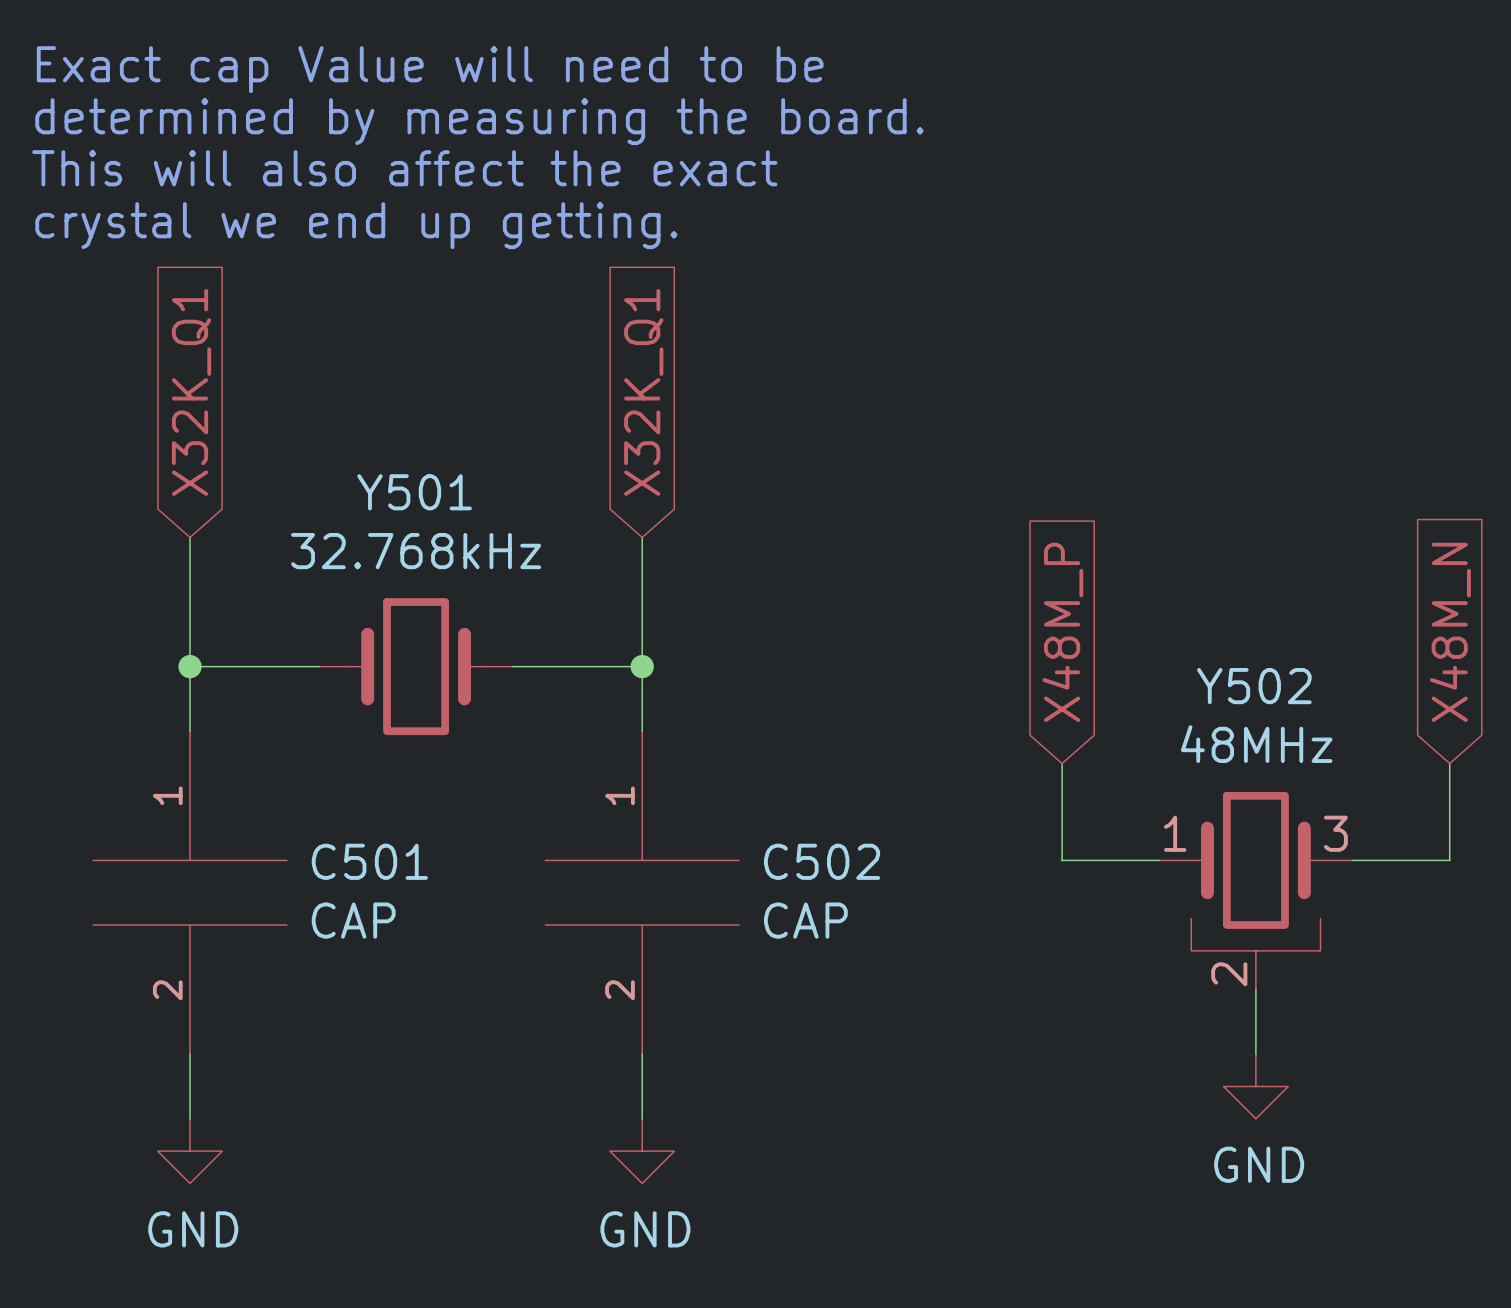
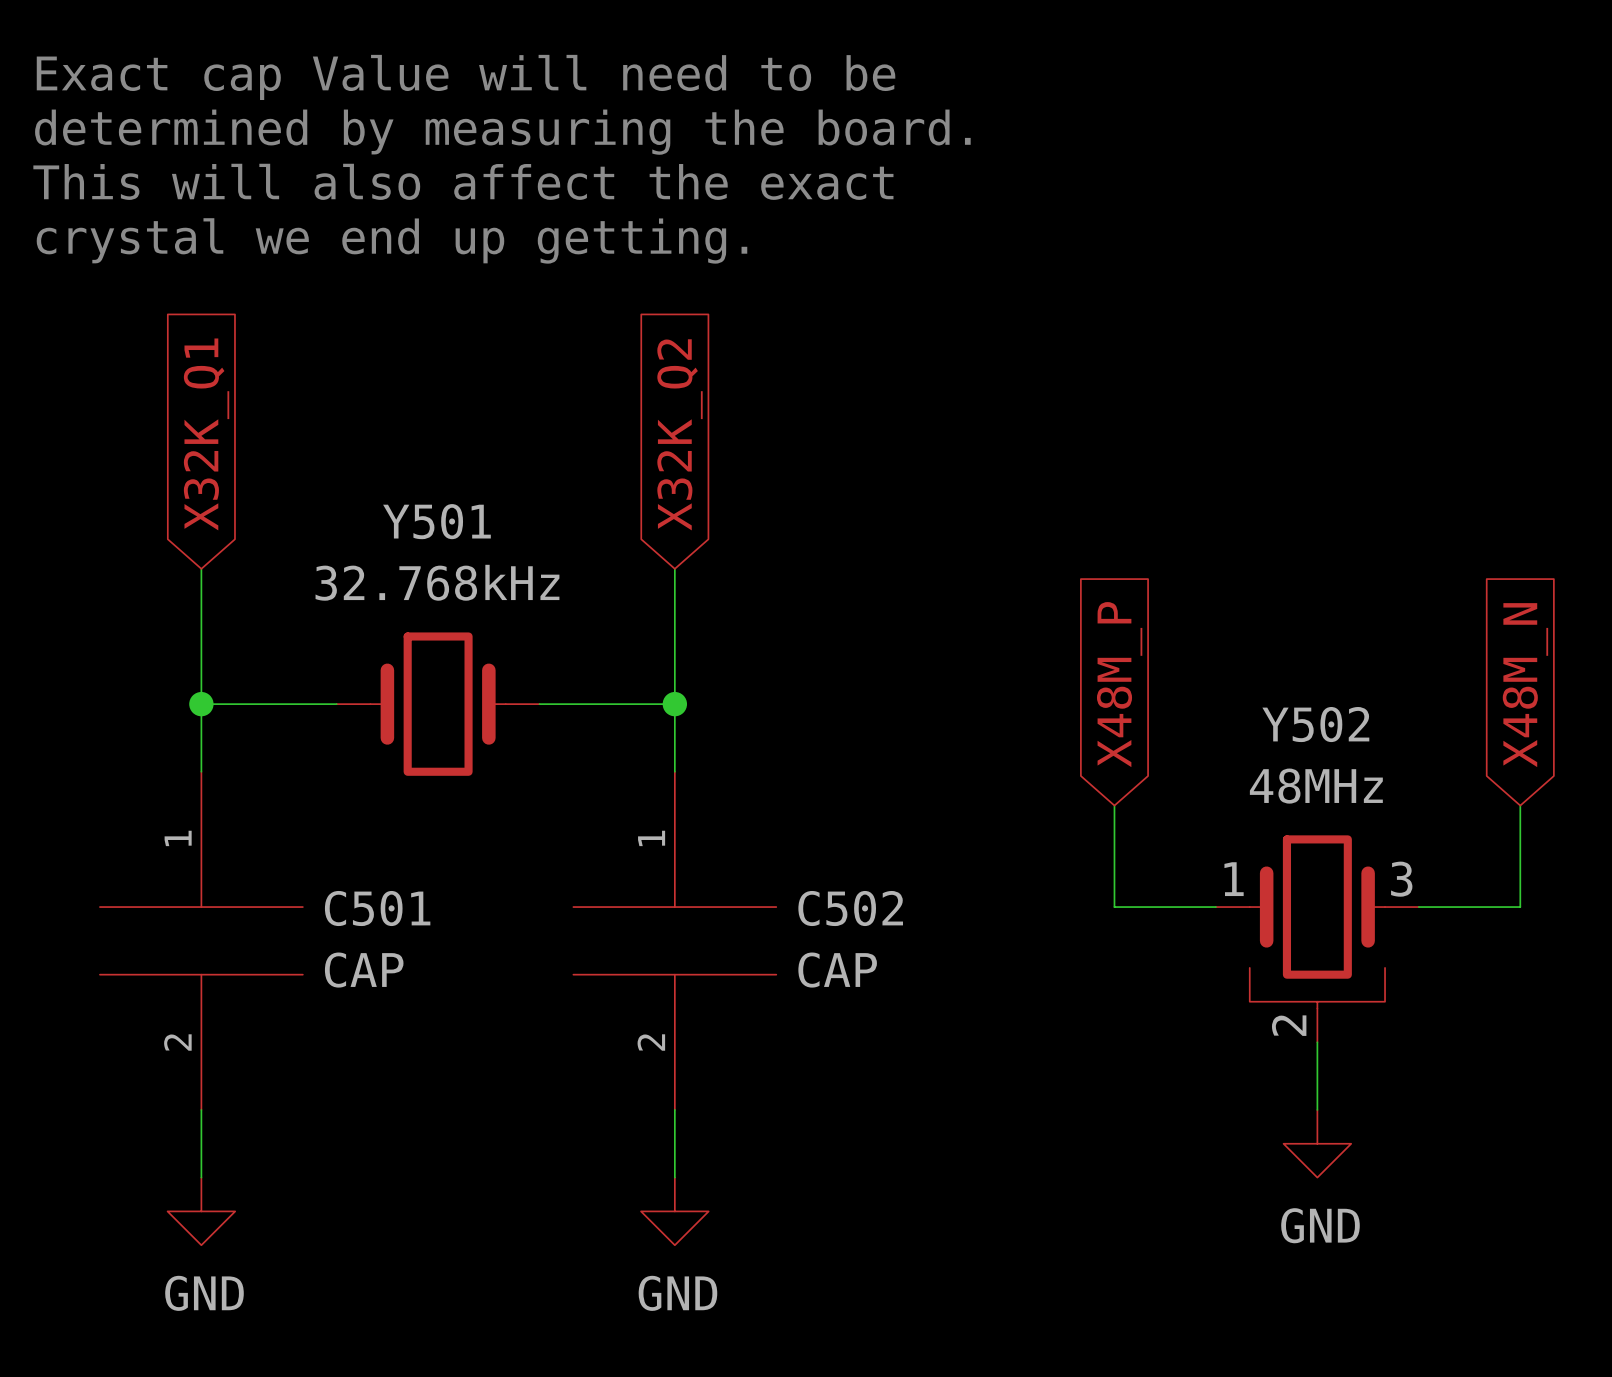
global label: X32K_Q1 (643, 392) -> X32K_Q2 (680, 434)

